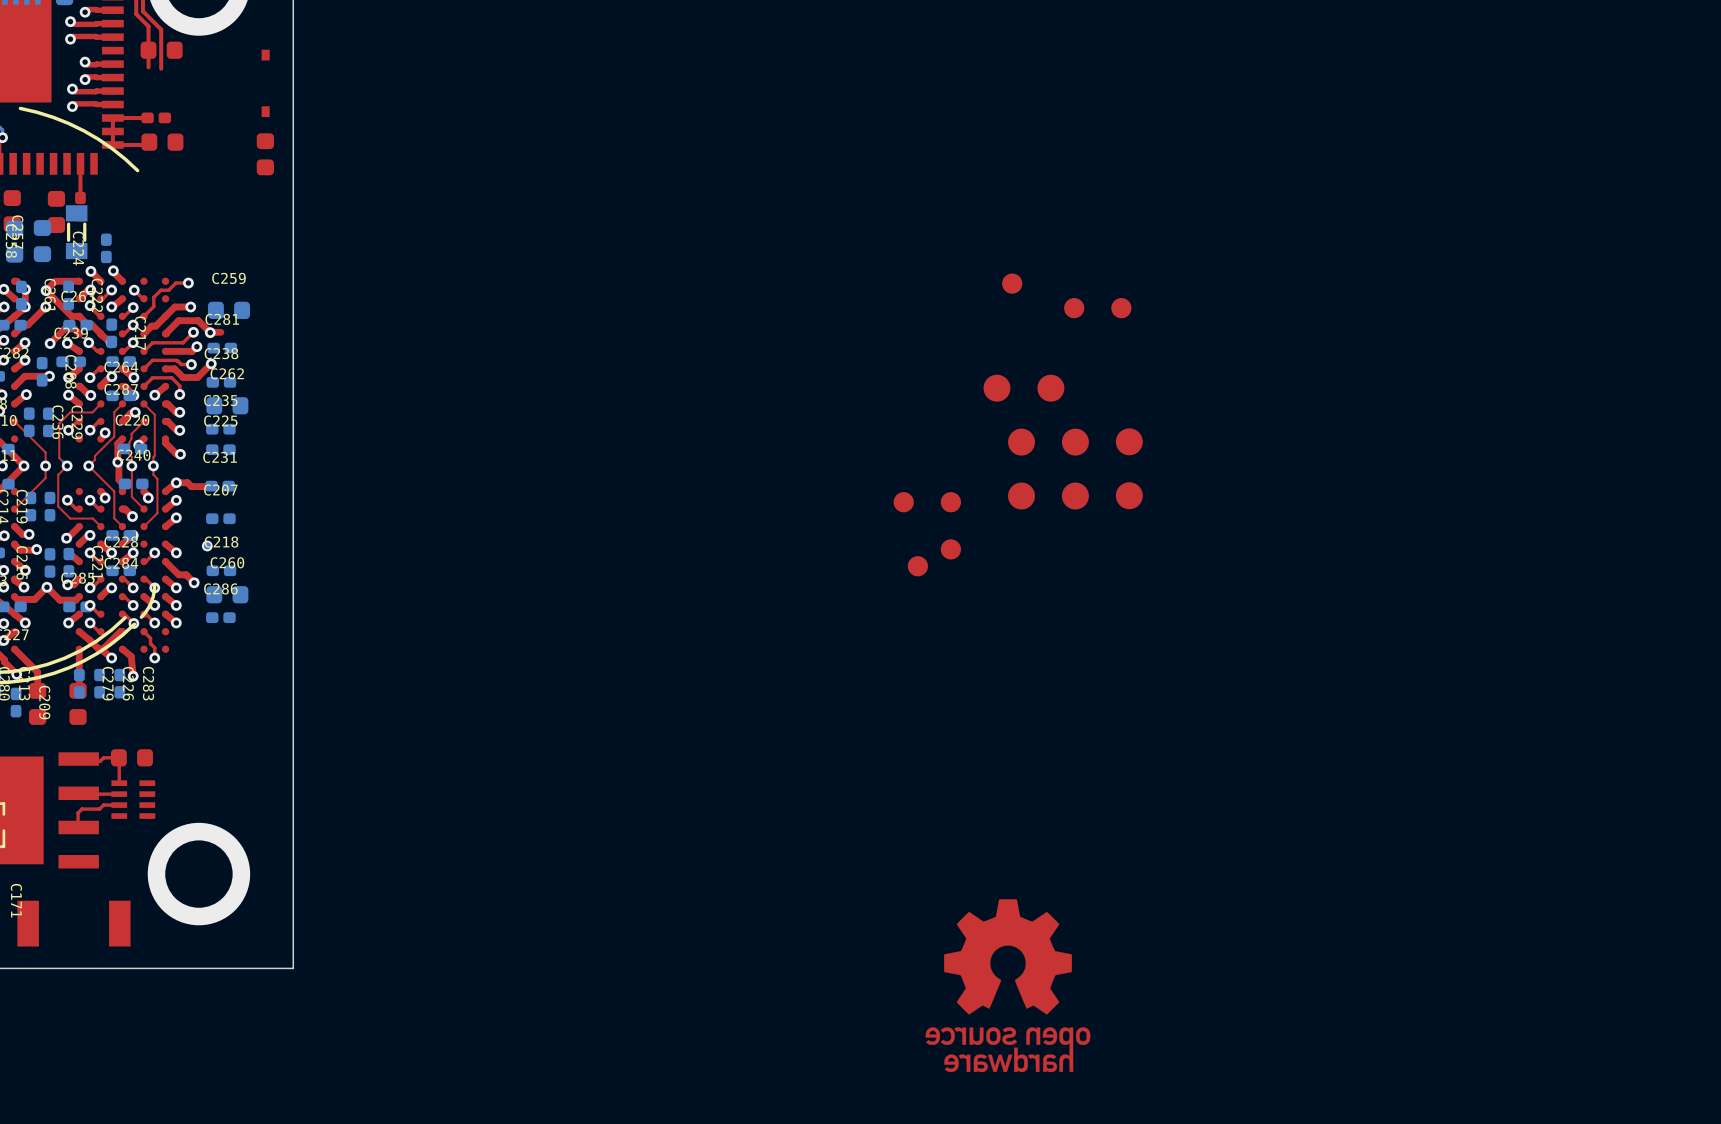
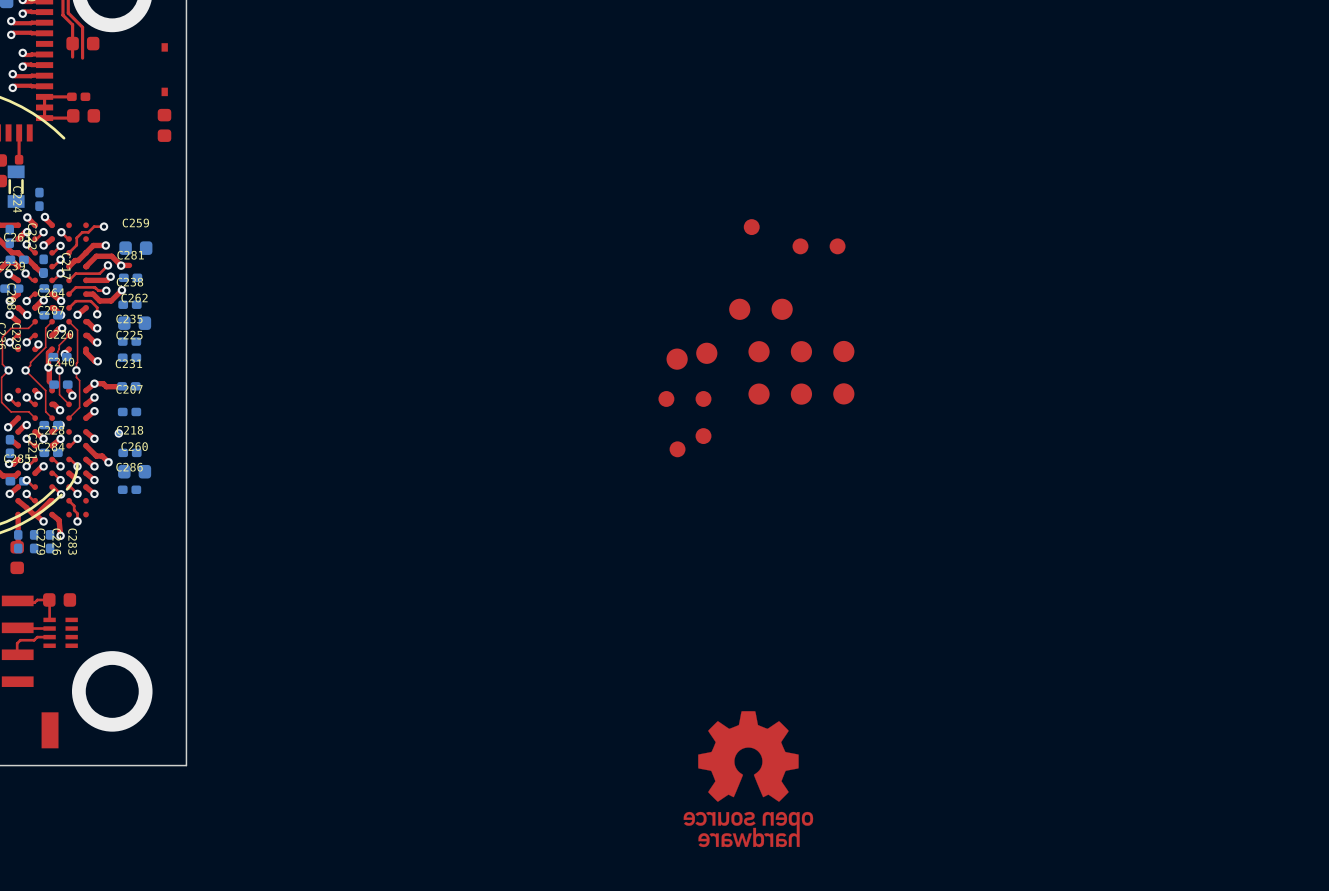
part: none -> (706, 353)
part: none -> (677, 359)

